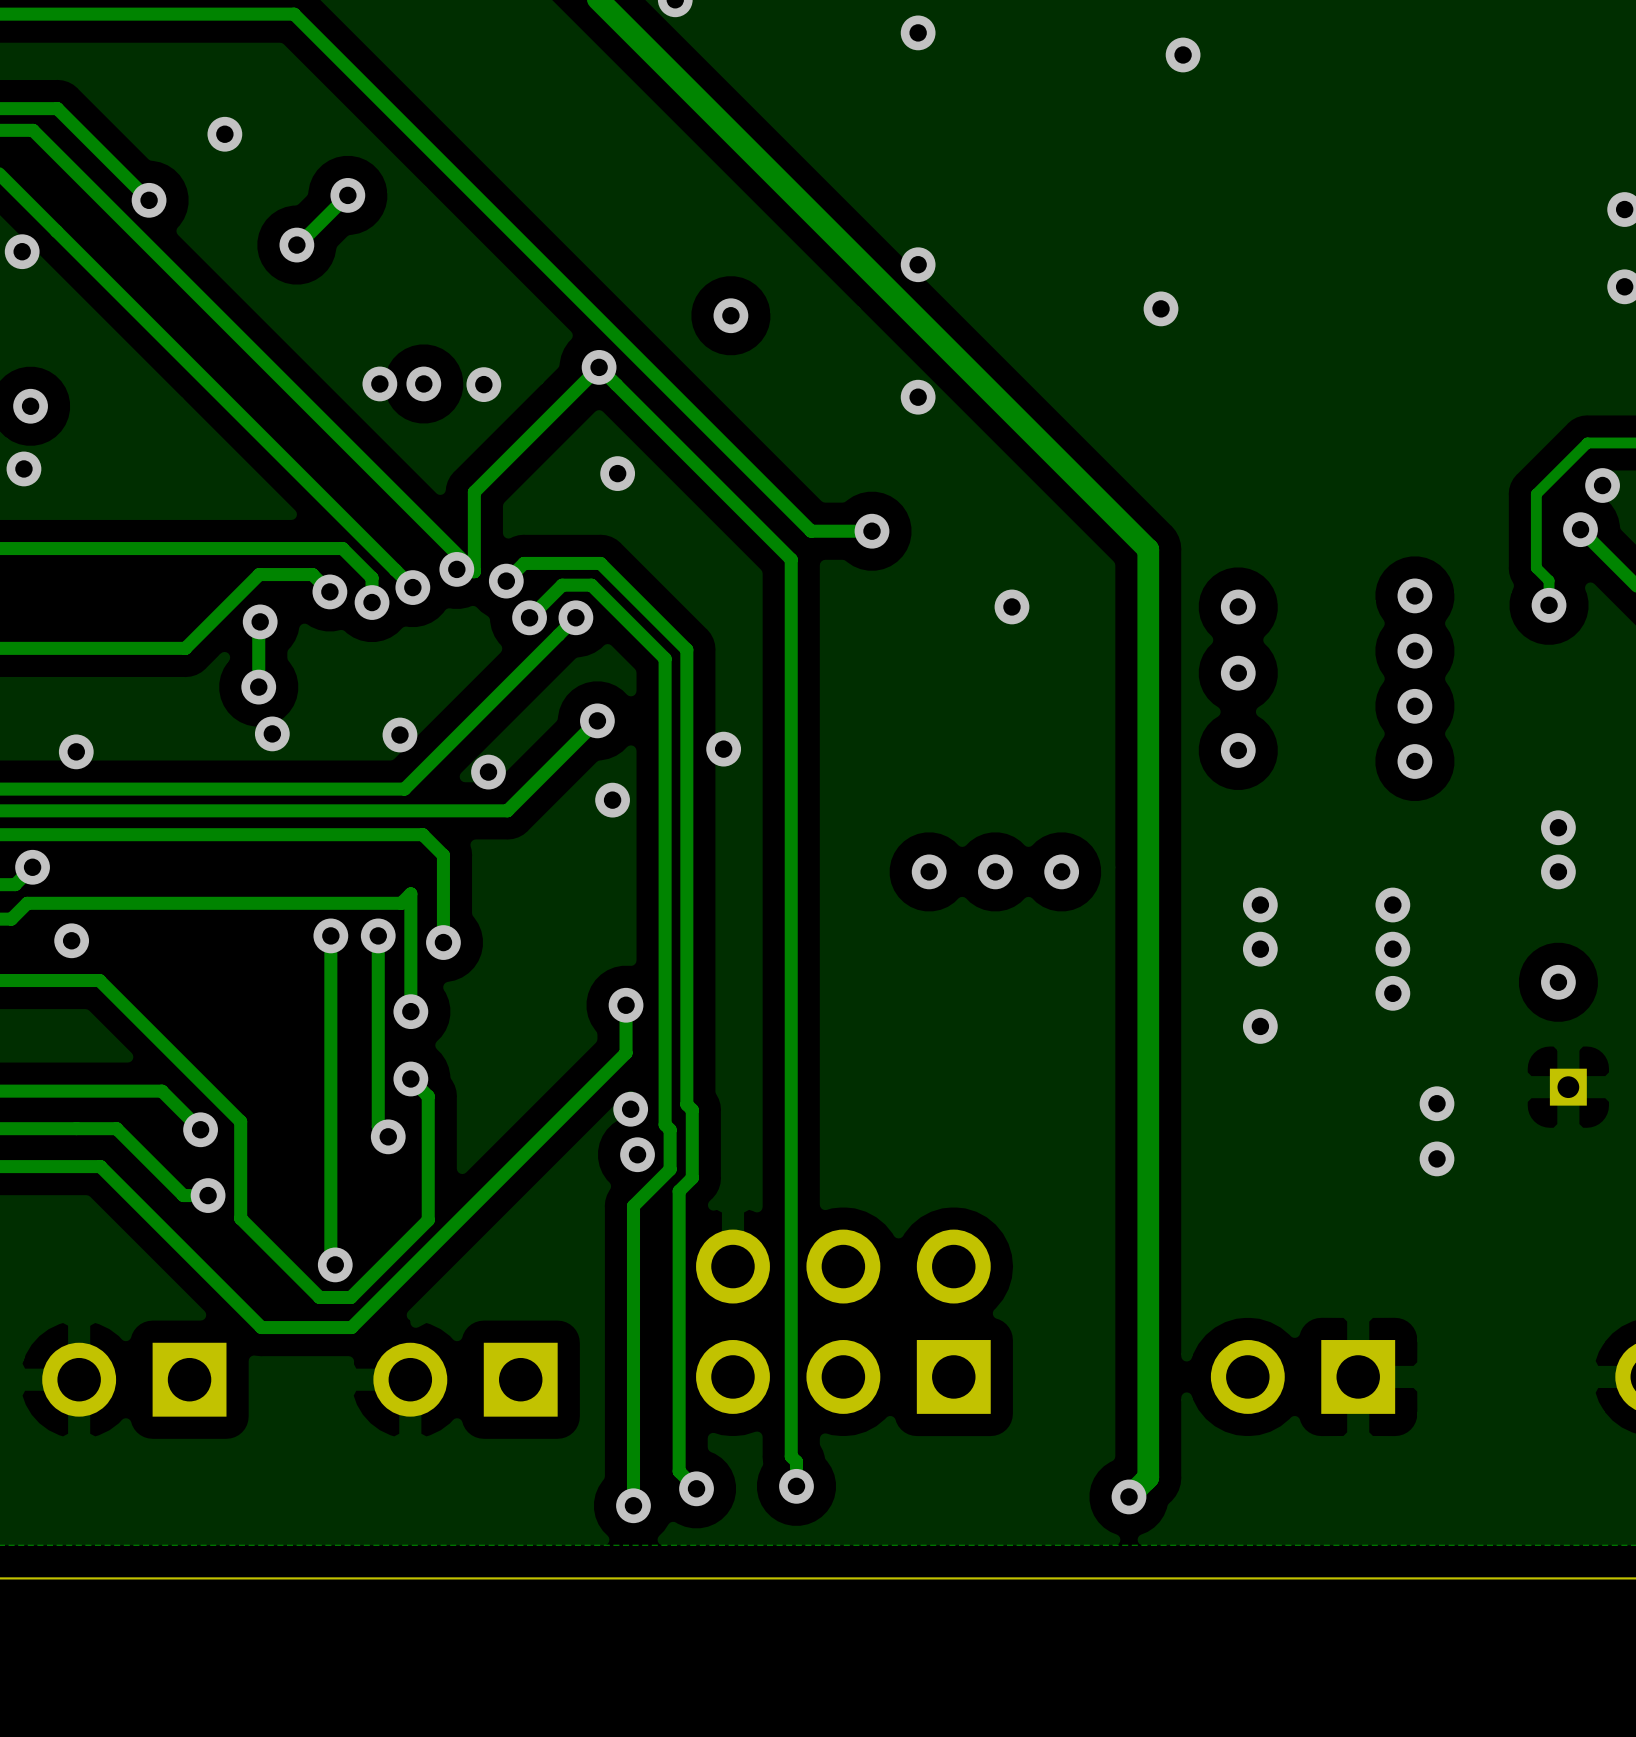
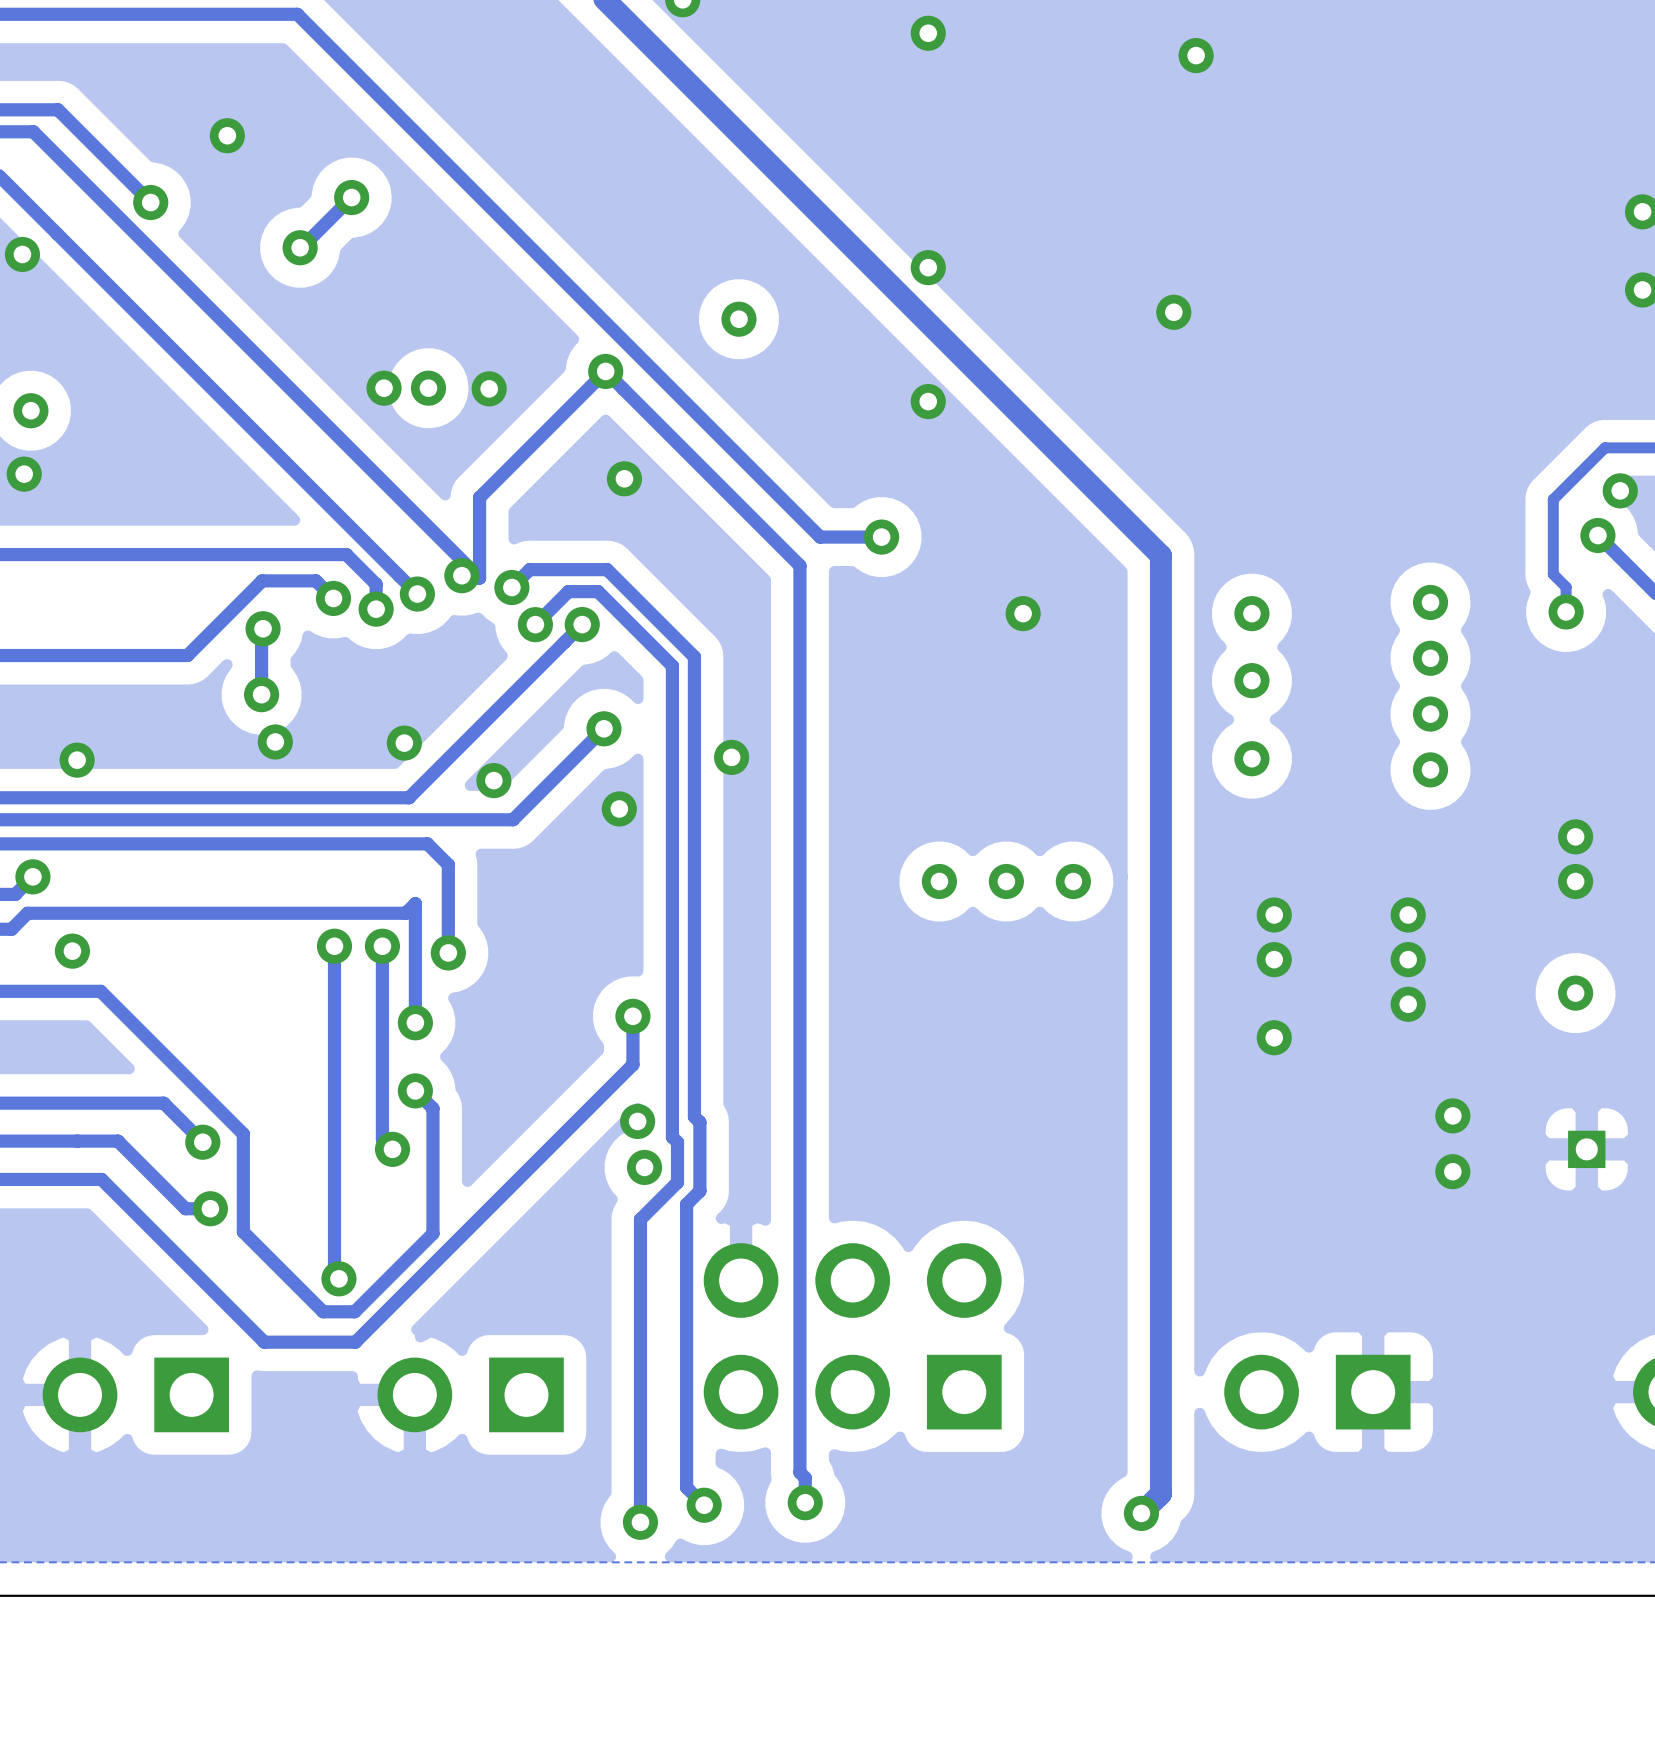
part position: (1568, 1087) -> (1586, 1149)

